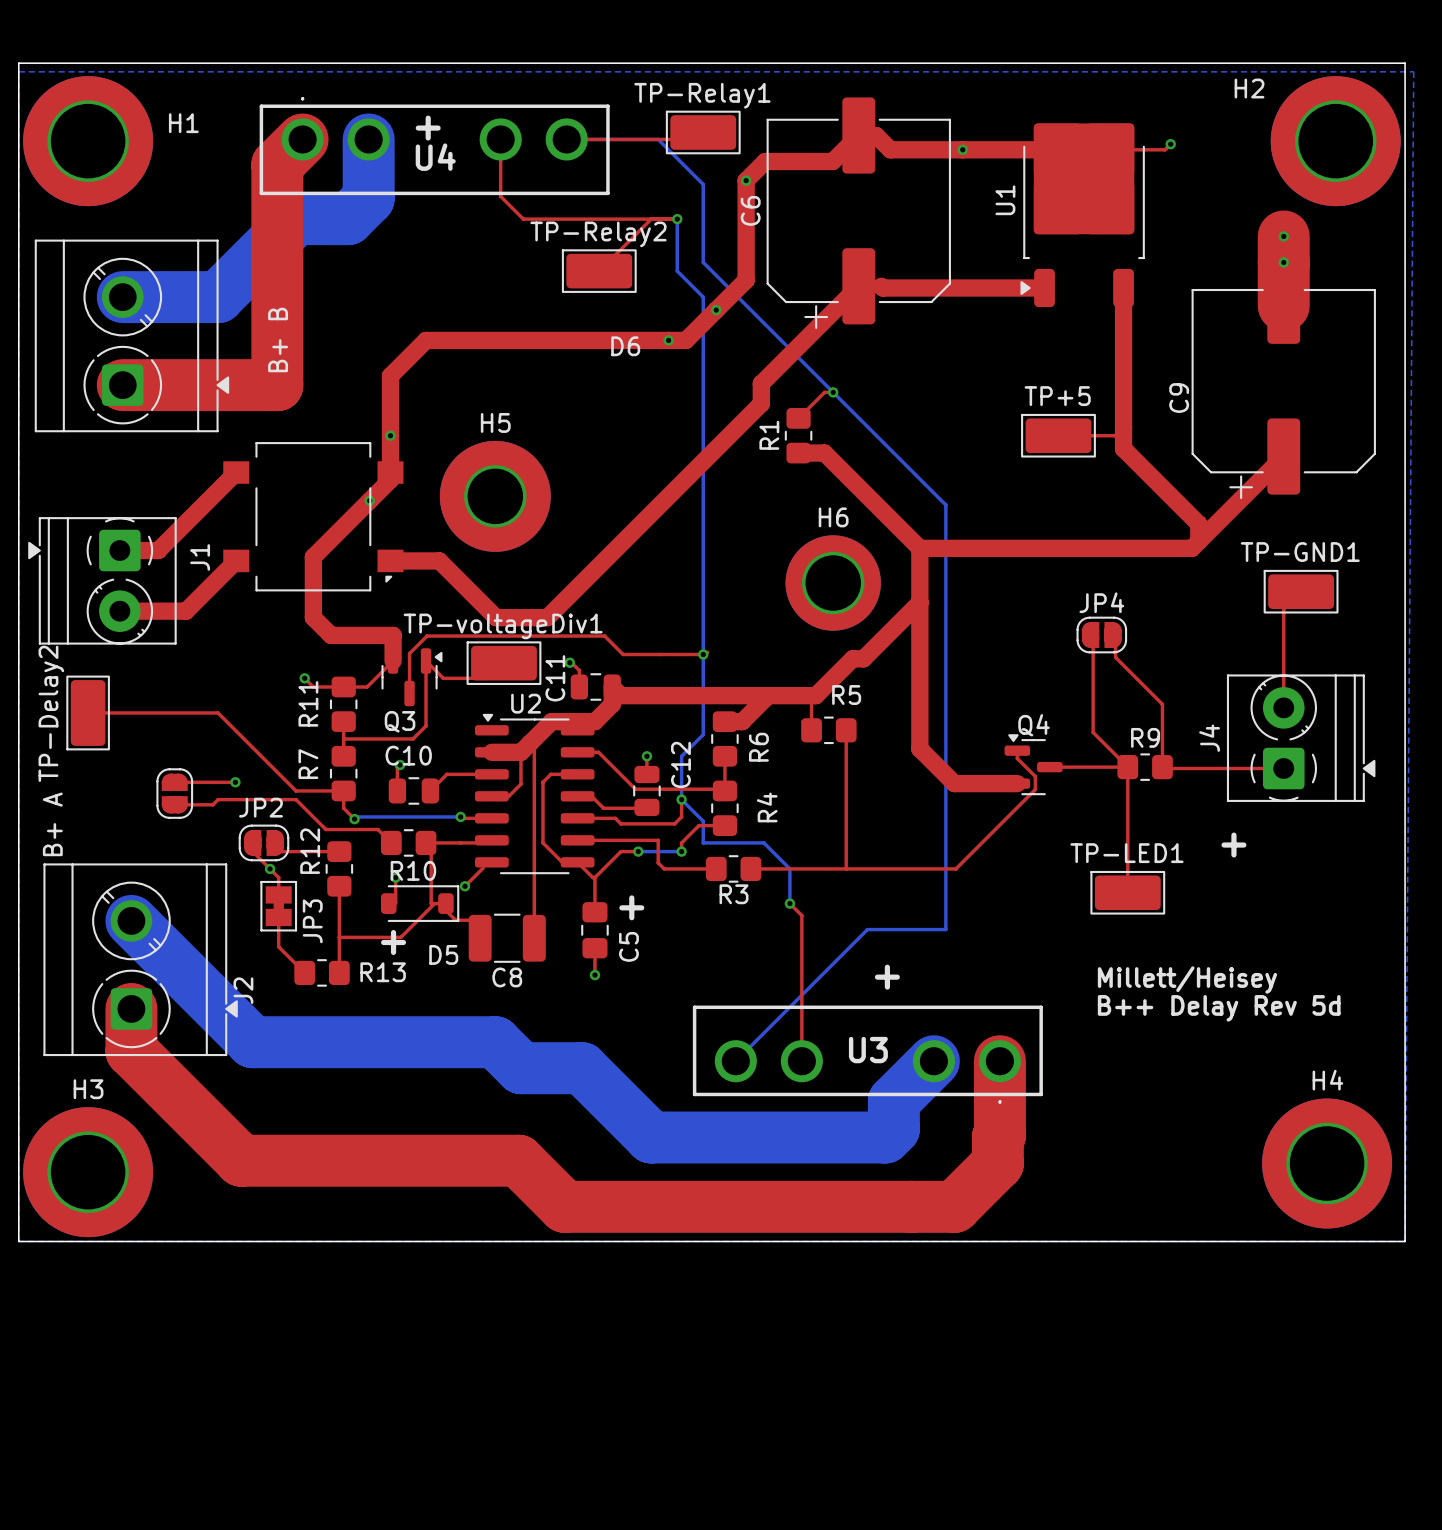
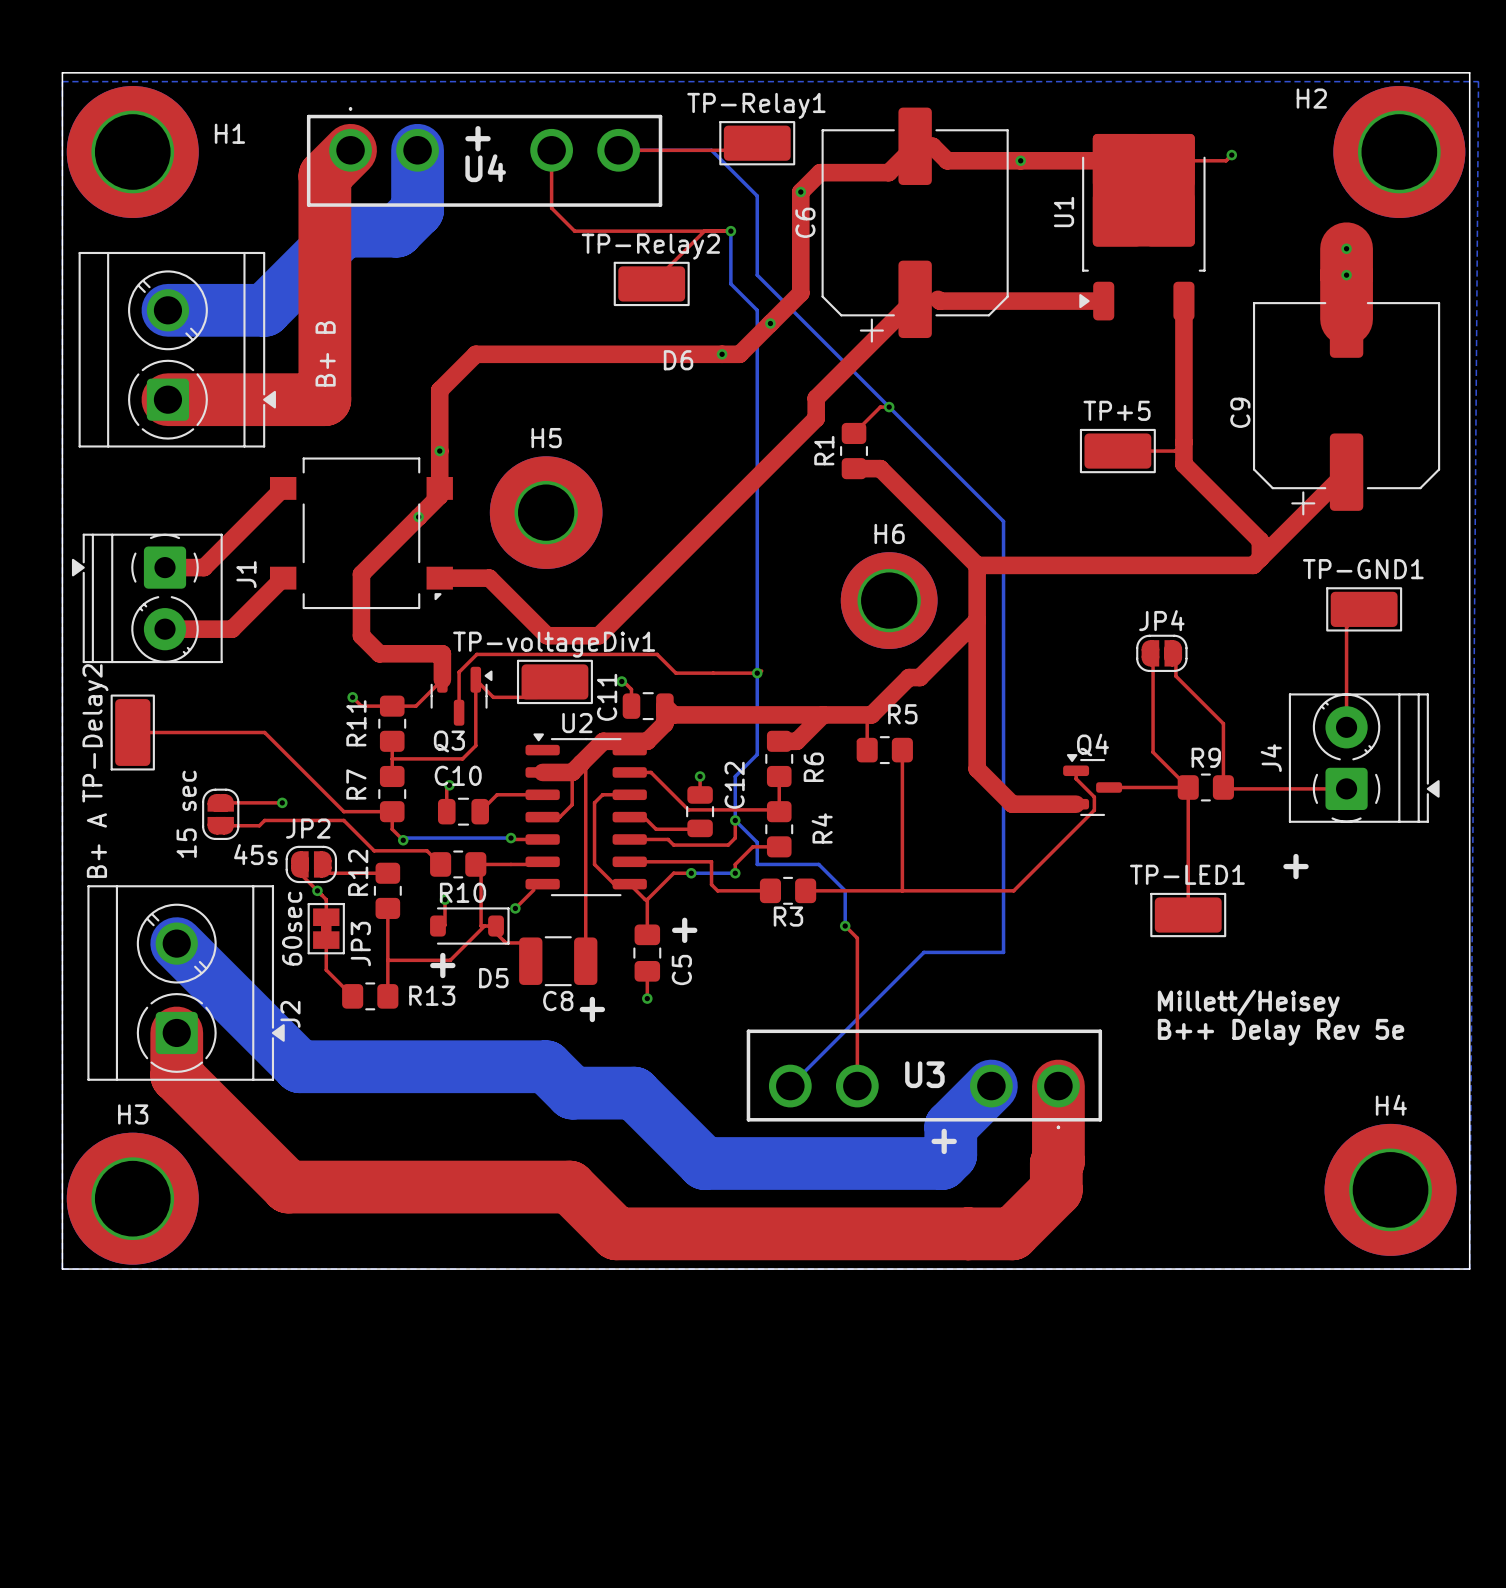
part value: none -> 15 sec (186, 814)
JP2 value: none -> 45s (255, 854)
JP3 value: none -> 60sec (292, 928)
text position: + (887, 977) -> + (944, 1141)
text: none -> + (592, 1009)
text: B++ Delay Rev 5d (1219, 1008) -> B++ Delay Rev 5e (1281, 1032)

